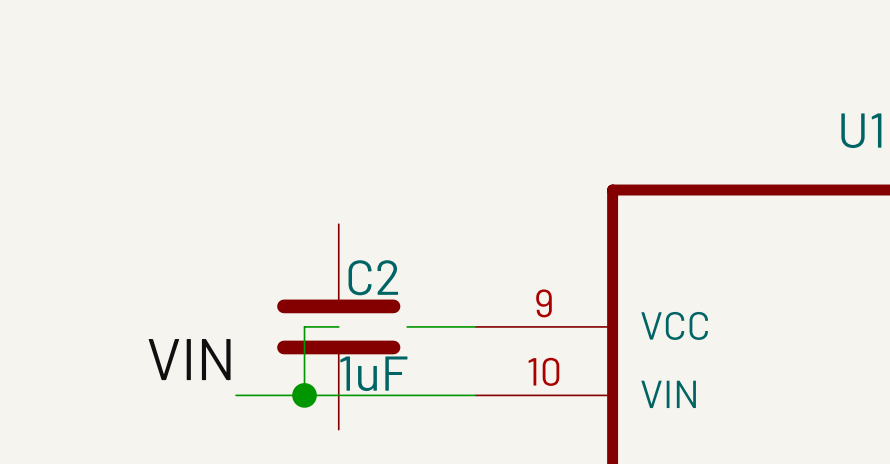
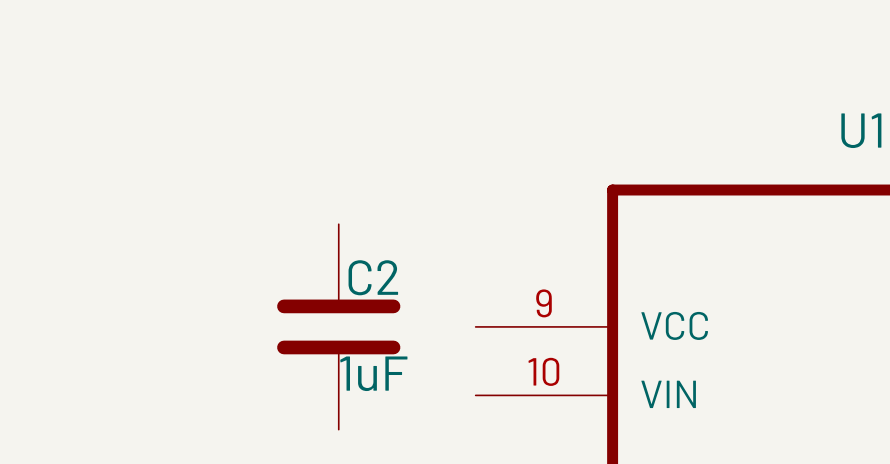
wire: (338, 326) (304, 326) (304, 395) -> none
wire: (407, 326) (475, 326) -> none
label: VIN (189, 359) -> none
wire: (236, 395) (475, 395) -> none
junction: (304, 395) -> none

